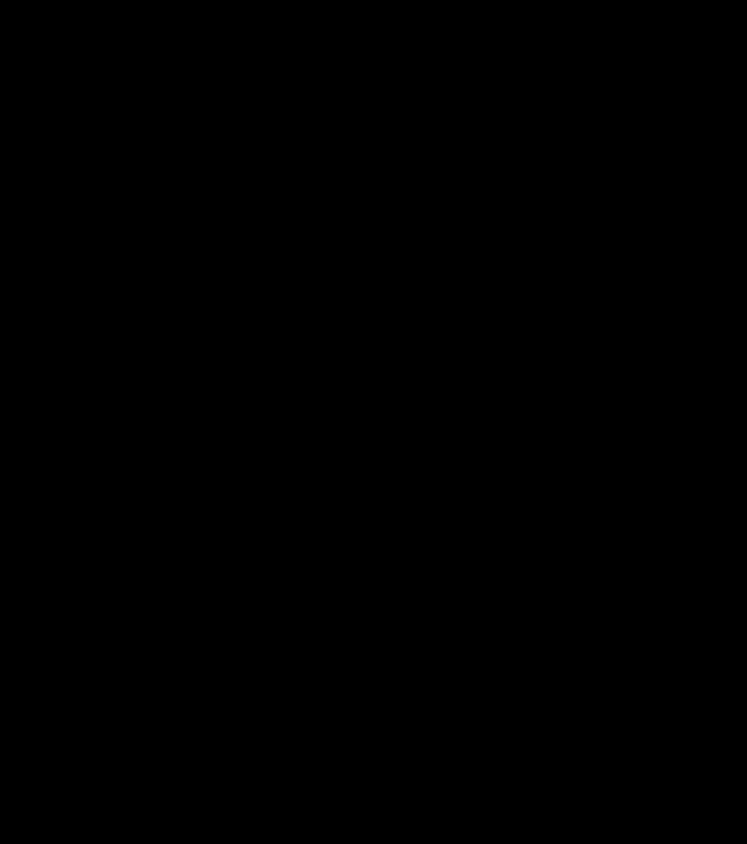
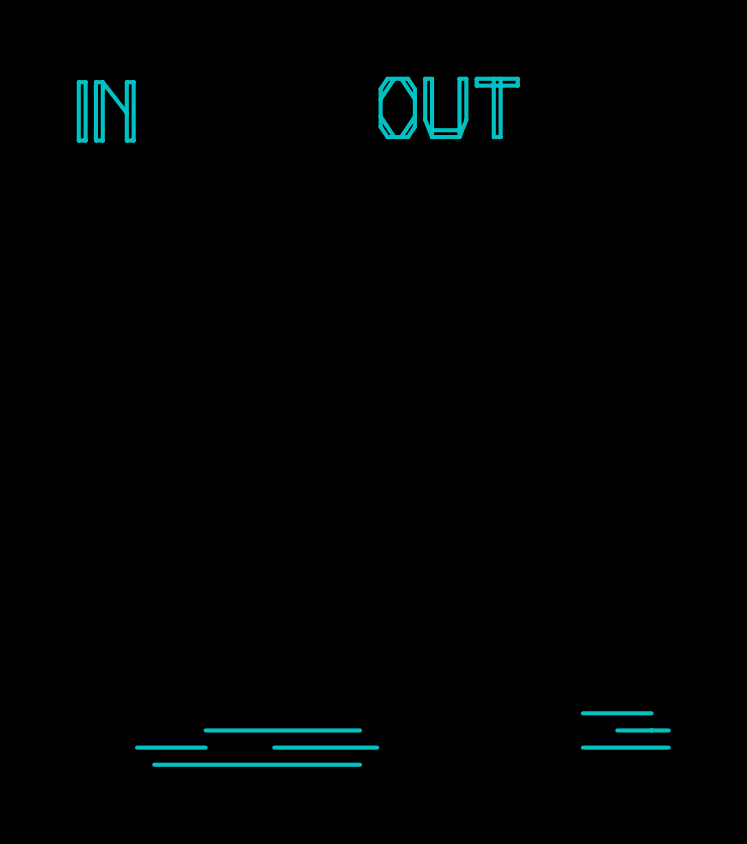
line: none -> (387, 78) (408, 78) (414, 89) (414, 126) (408, 137) (387, 137) (380, 126) (380, 89) (387, 78)
line: none -> (394, 78) (380, 99)
line: none -> (401, 78) (414, 99)
line: none -> (476, 78) (517, 78) (517, 85) (476, 85) (476, 78)
line: none -> (493, 78) (493, 137) (500, 137) (500, 78)
line: none -> (78, 82) (85, 82) (85, 140) (78, 140) (78, 82)
line: none -> (102, 82) (95, 82) (95, 140) (102, 140) (102, 82)
line: none -> (102, 82) (126, 113)
line: none -> (126, 82) (126, 140) (133, 140) (133, 82) (126, 82)
line: none -> (380, 116) (394, 137)
line: none -> (414, 116) (401, 137)
line: none -> (432, 130) (459, 130)
line: none -> (432, 137) (459, 137)
line: none -> (432, 137) (425, 119) (425, 78) (432, 78) (432, 137)
line: none -> (459, 137) (459, 78) (466, 78) (466, 119) (459, 137)
line: none -> (582, 713) (651, 713)
line: none -> (205, 730) (360, 730)
line: none -> (617, 730) (668, 730)
line: none -> (137, 747) (205, 747)
line: none -> (274, 747) (377, 747)
line: none -> (582, 747) (668, 747)
line: none -> (154, 764) (360, 764)

